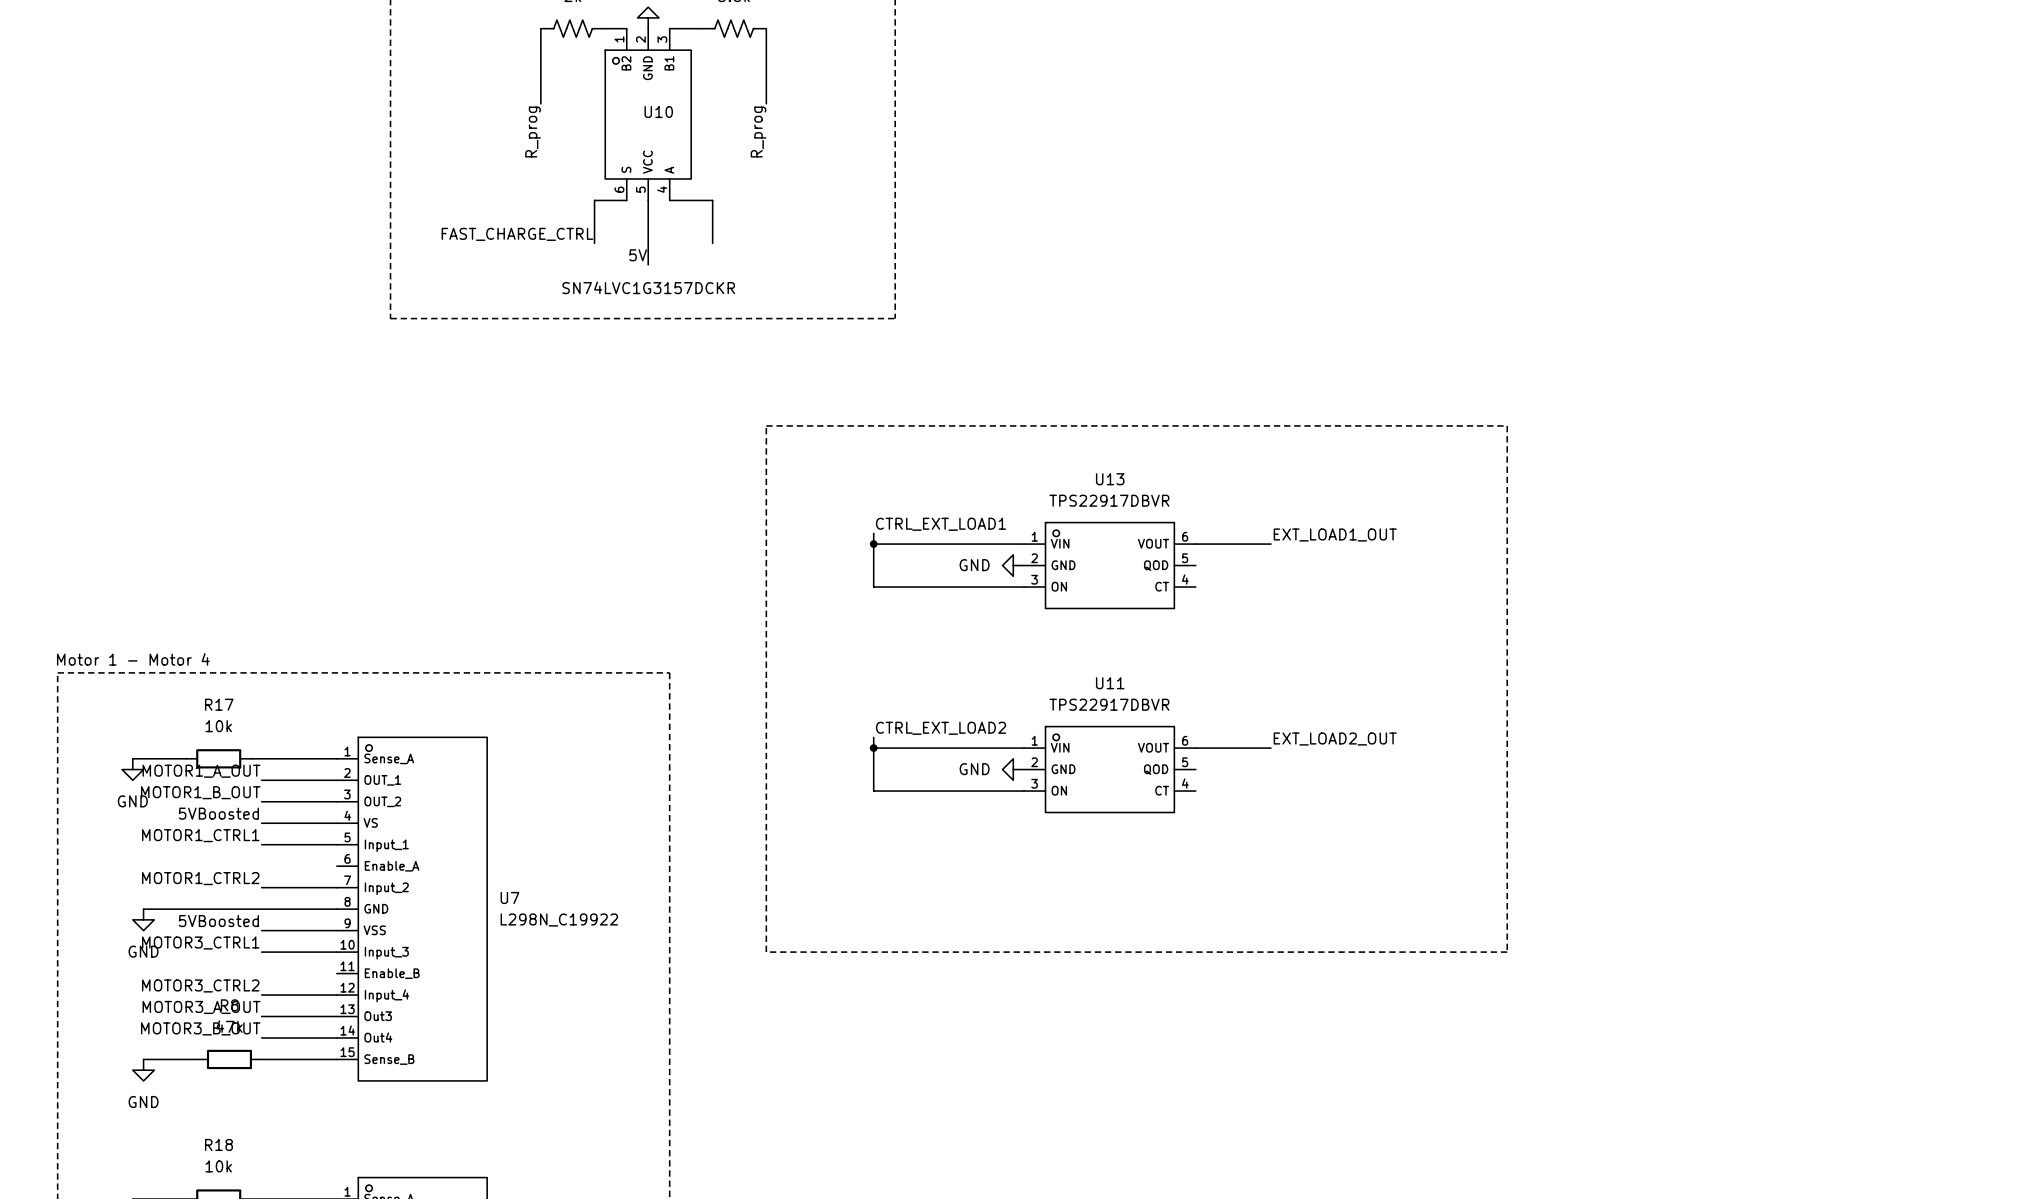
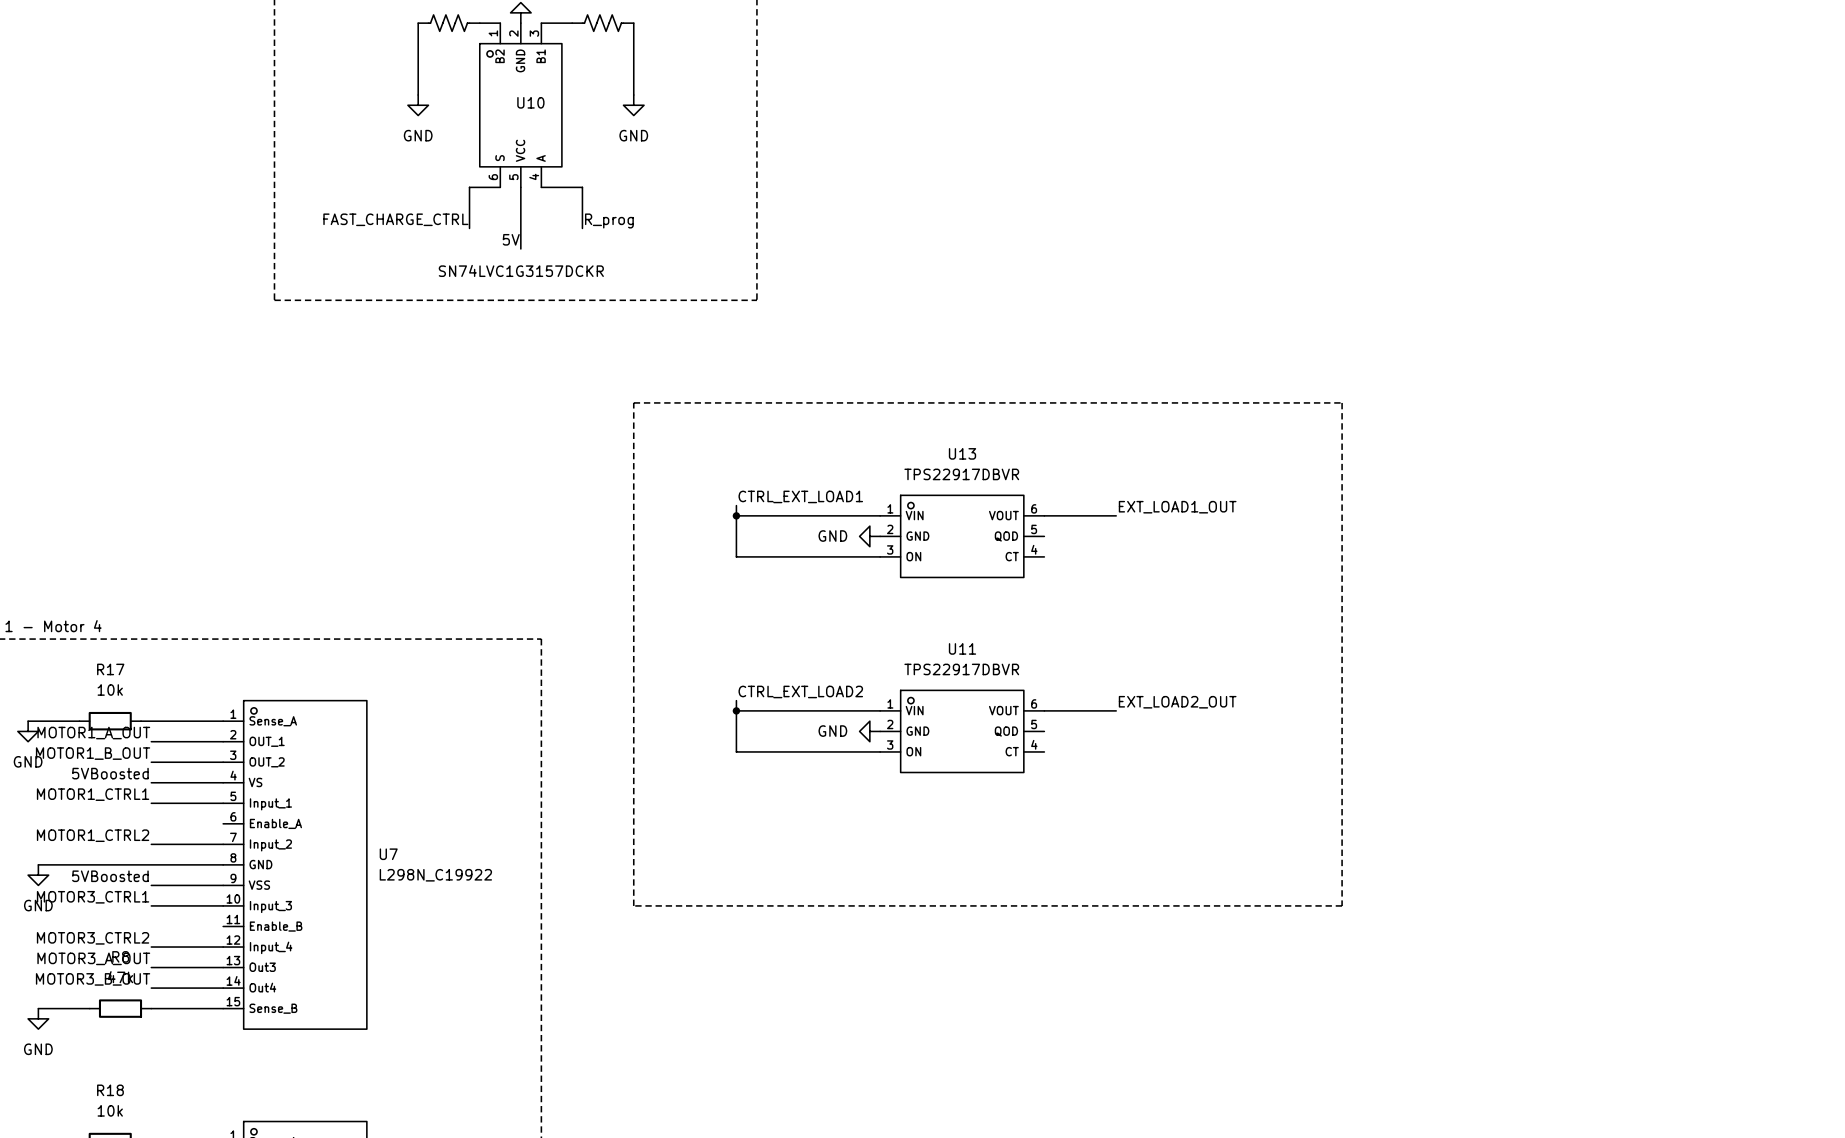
power symbol: none -> GND (418, 105)
power symbol: none -> GND (633, 105)
label: R_prog (533, 132) -> none
label: R_prog (758, 132) -> none
label: none -> R_prog (609, 220)

